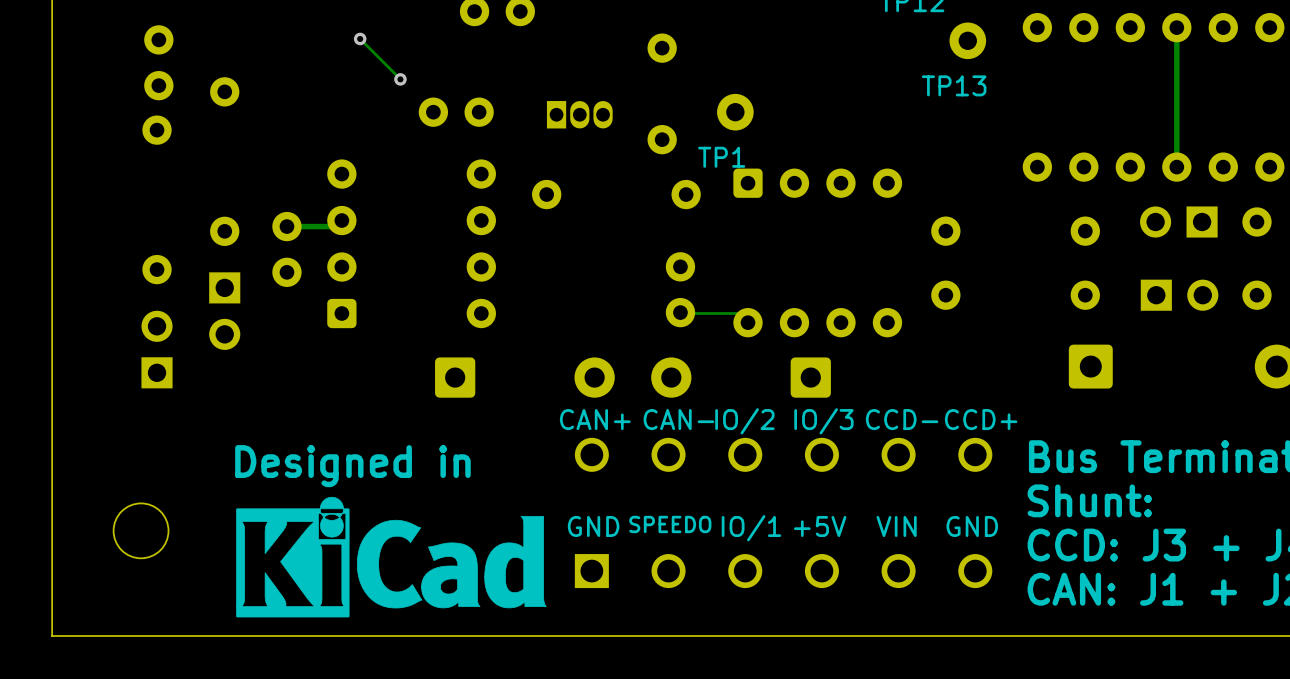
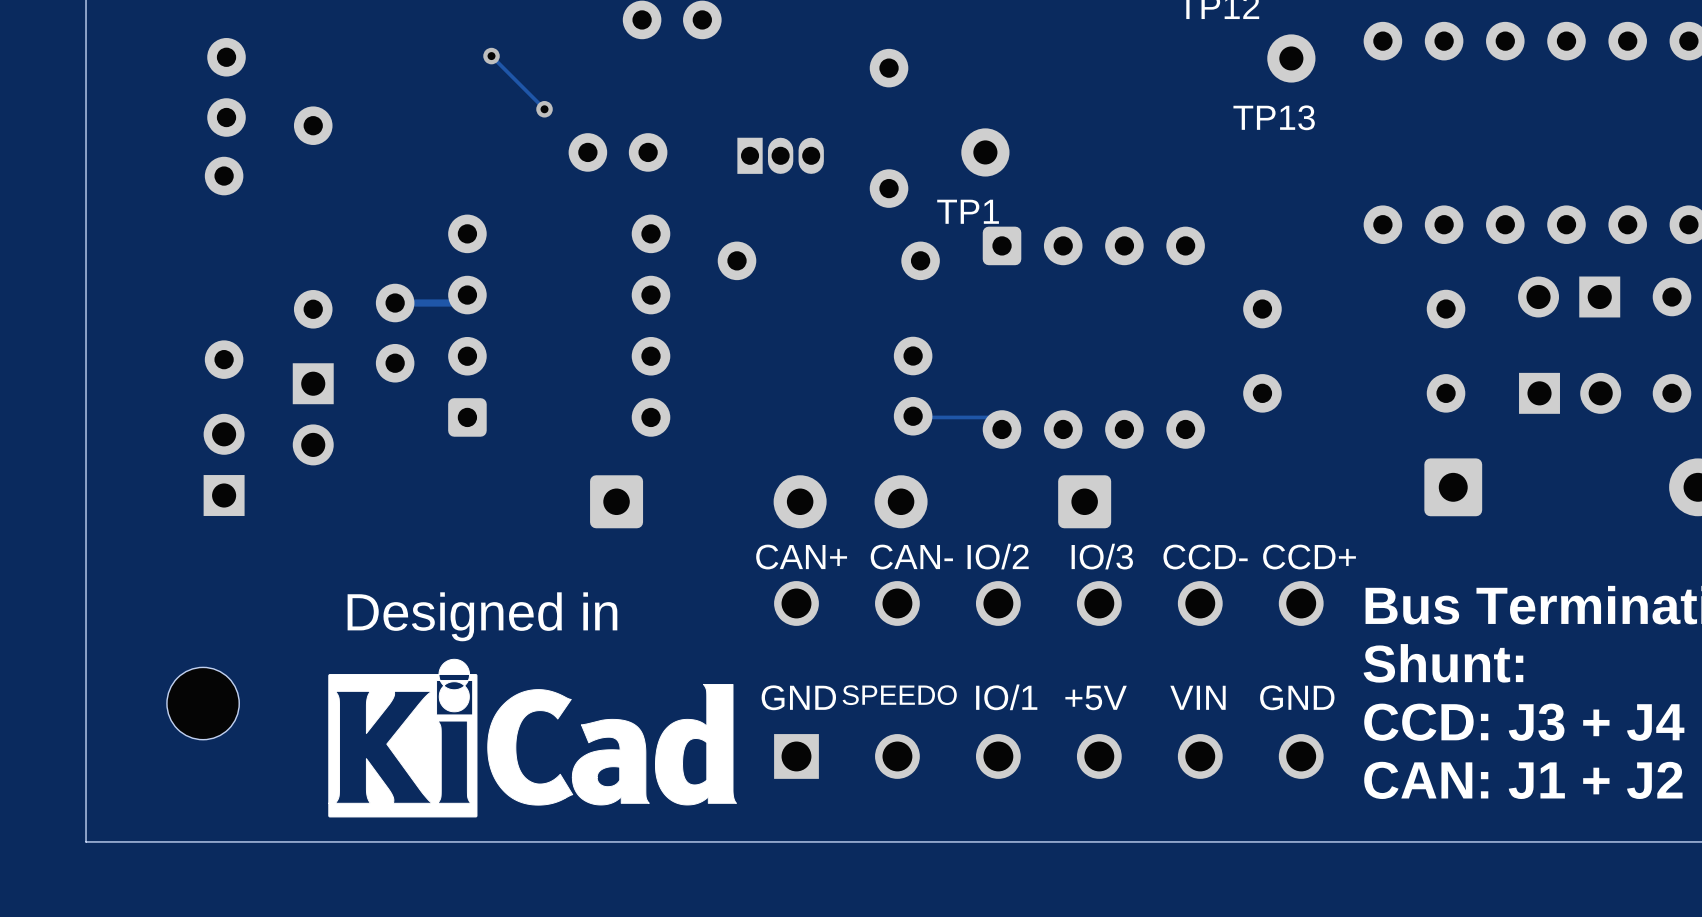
track: (1176, 27) (1176, 167) -> none

